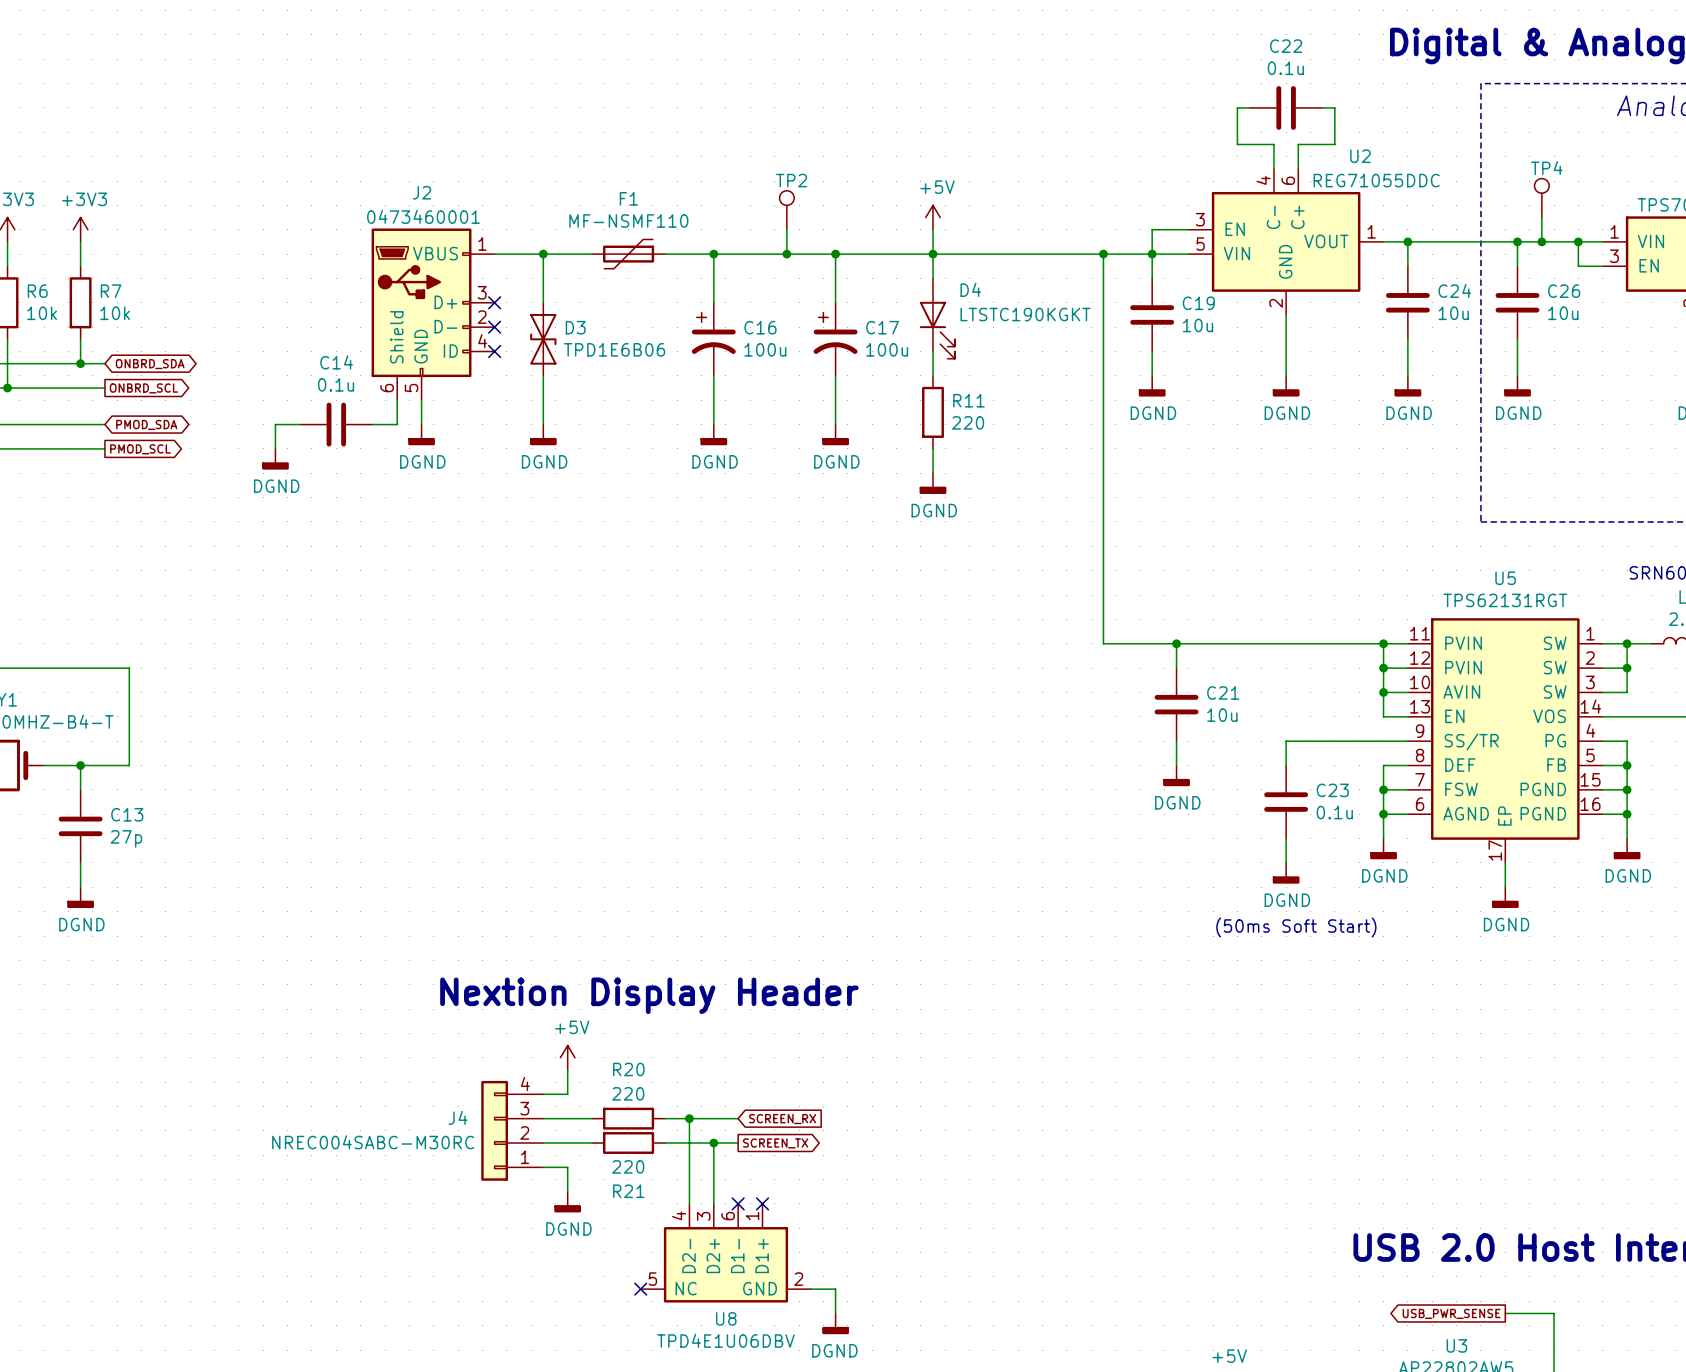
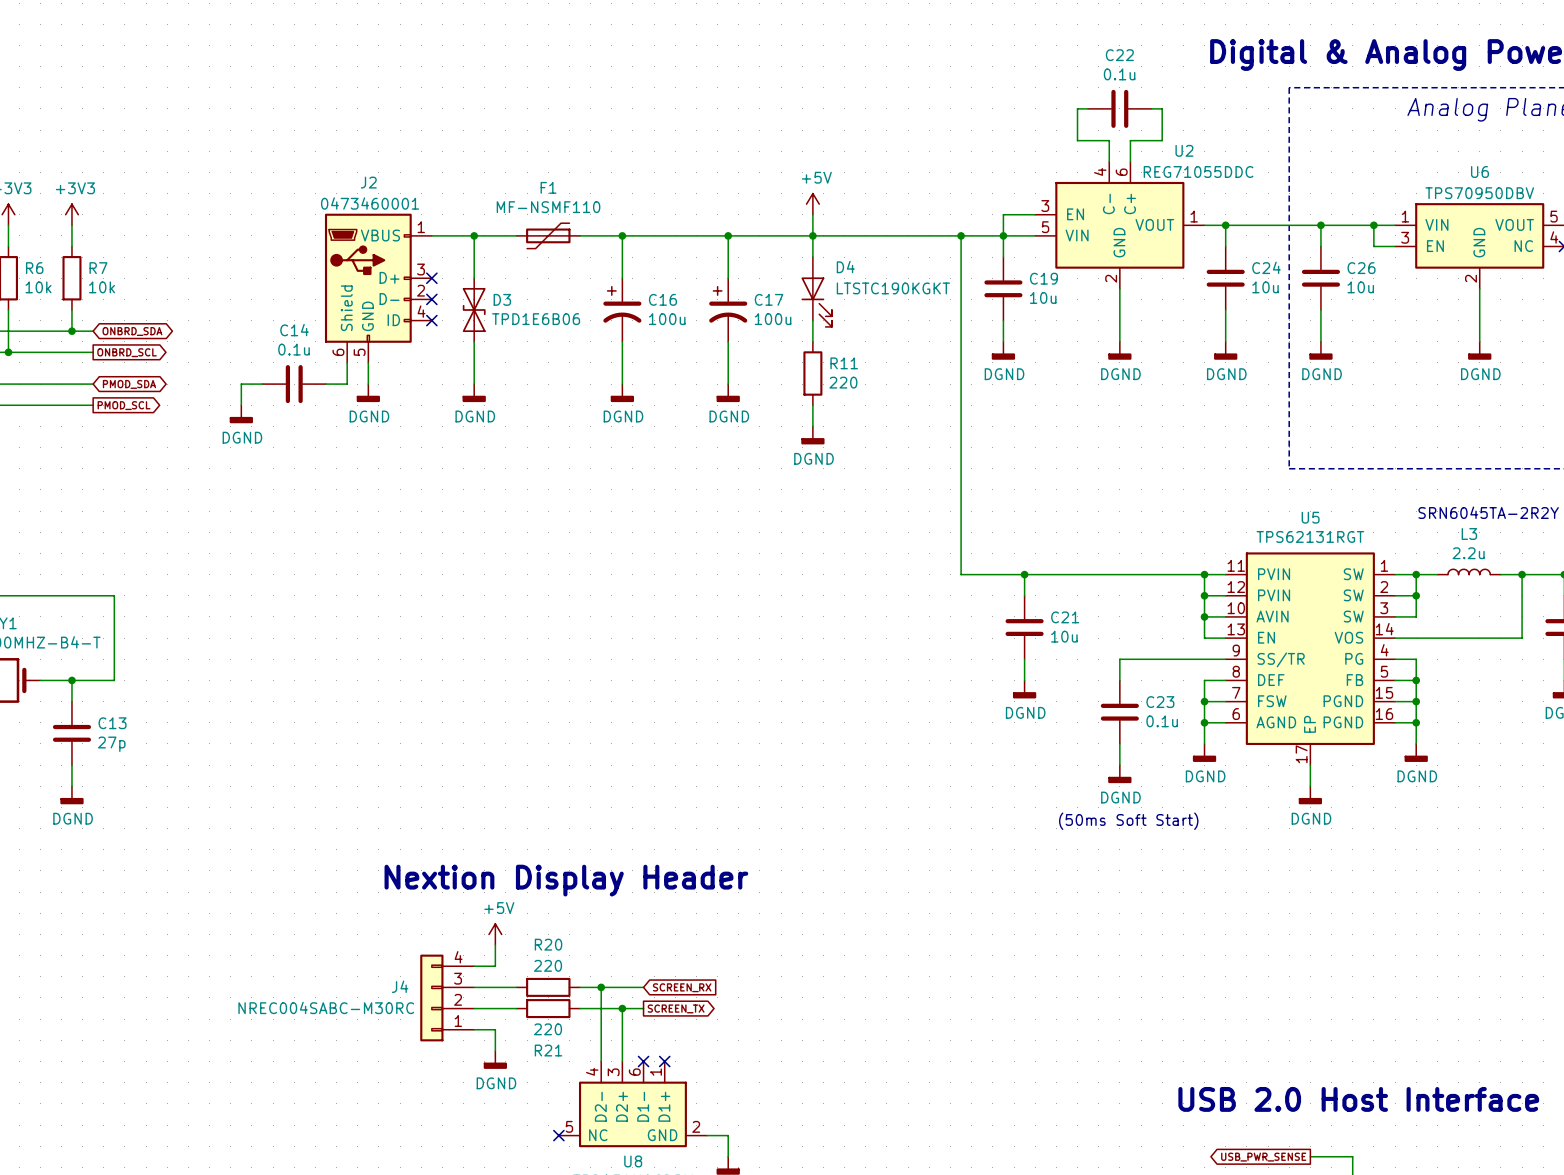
TP4: (1541, 198) -> none
TP2: (786, 210) -> none
wire: (1541, 217) (1541, 241) -> none
wire: (786, 229) (786, 254) -> none
junction: (1541, 241) -> none
junction: (786, 254) -> none

